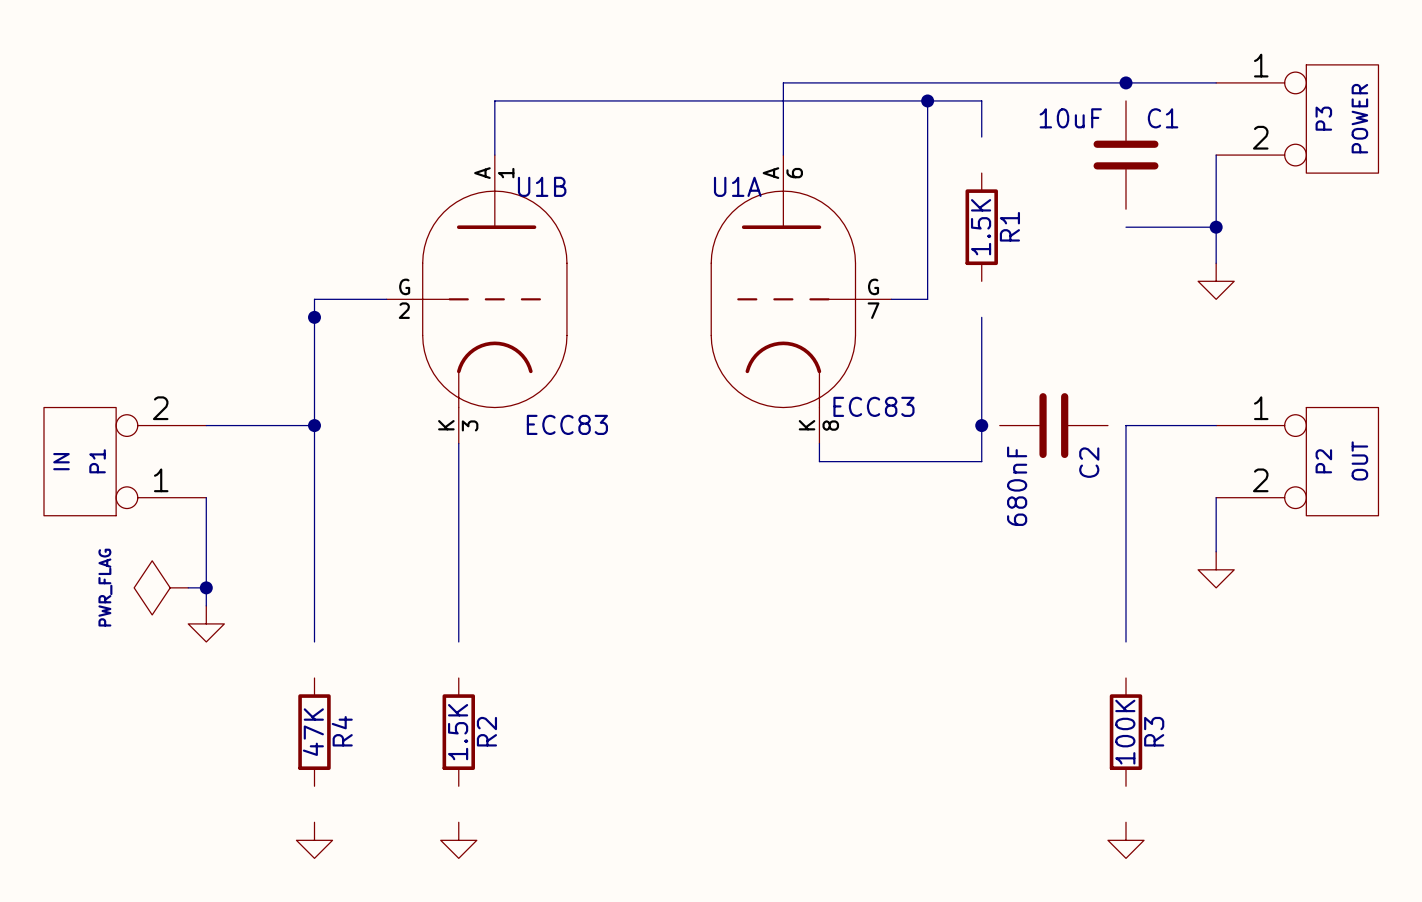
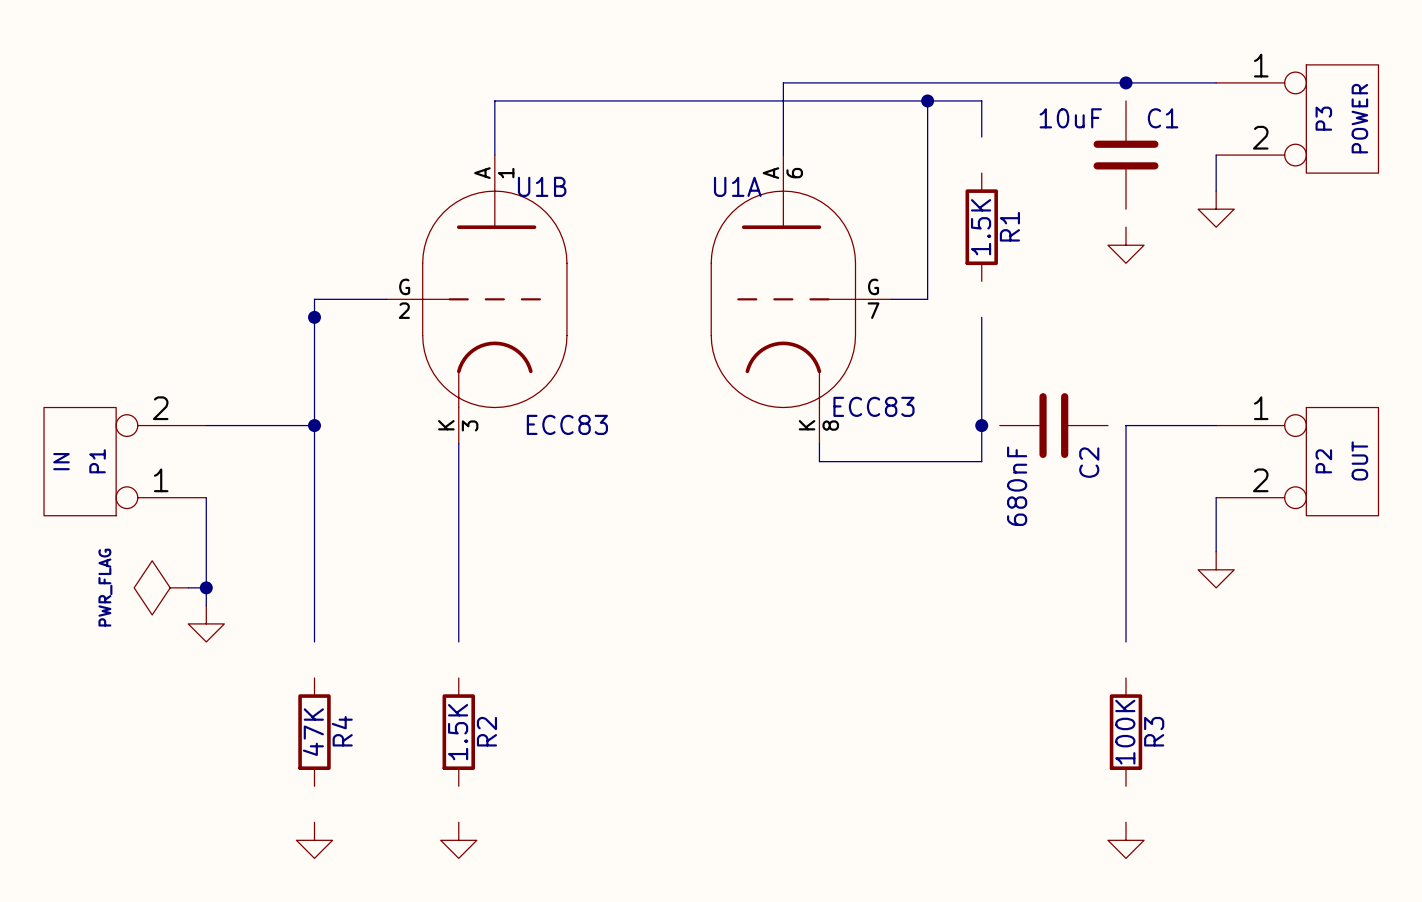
wire: (1216, 191) (1216, 263) -> none
power symbol: none -> (1216, 209)
wire: (1126, 227) (1216, 227) -> none
junction: (1216, 227) -> none
power symbol: none -> (1126, 245)
power symbol: (1216, 281) -> none

